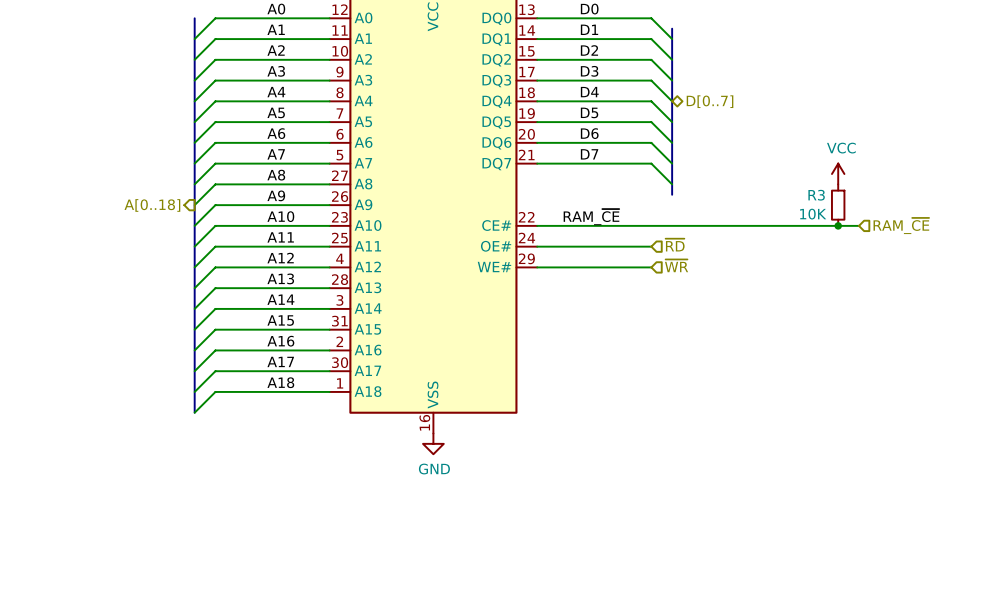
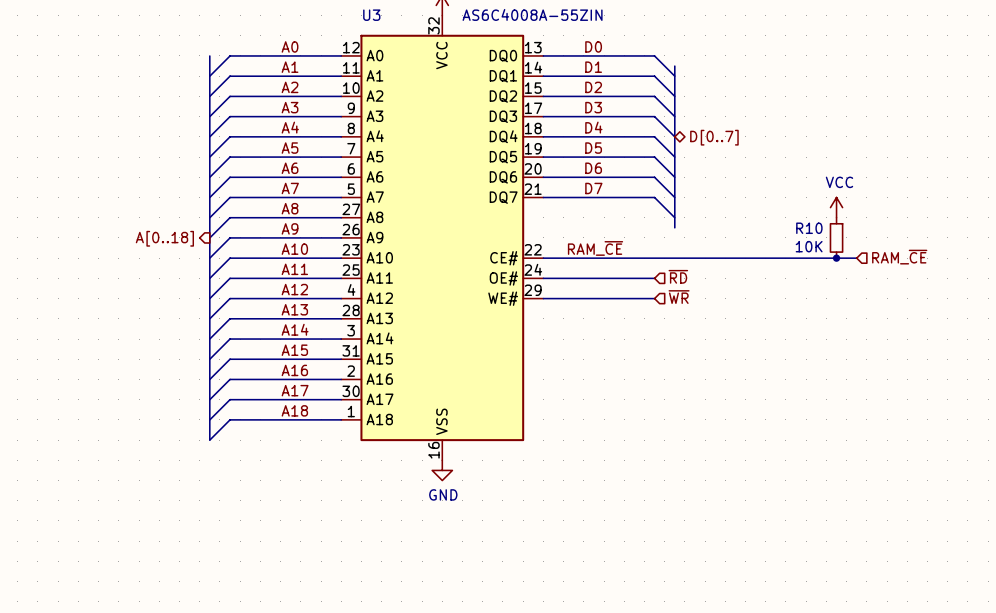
R3 name: R3 (816, 195) -> R10 (809, 228)

